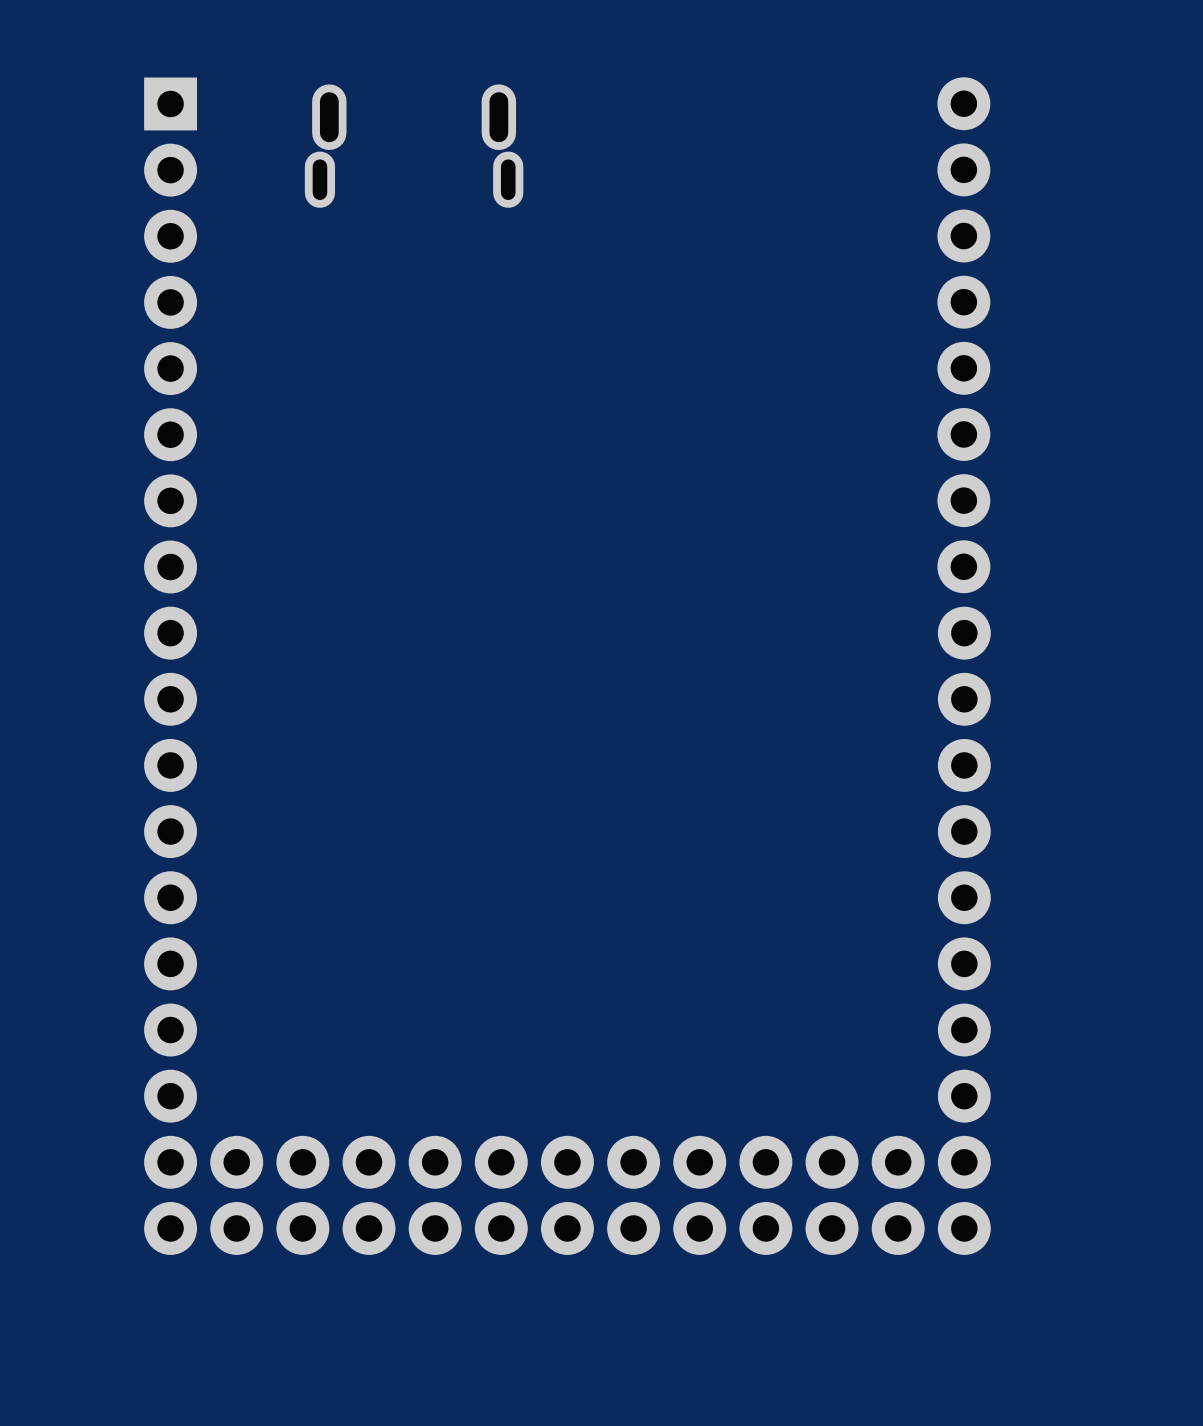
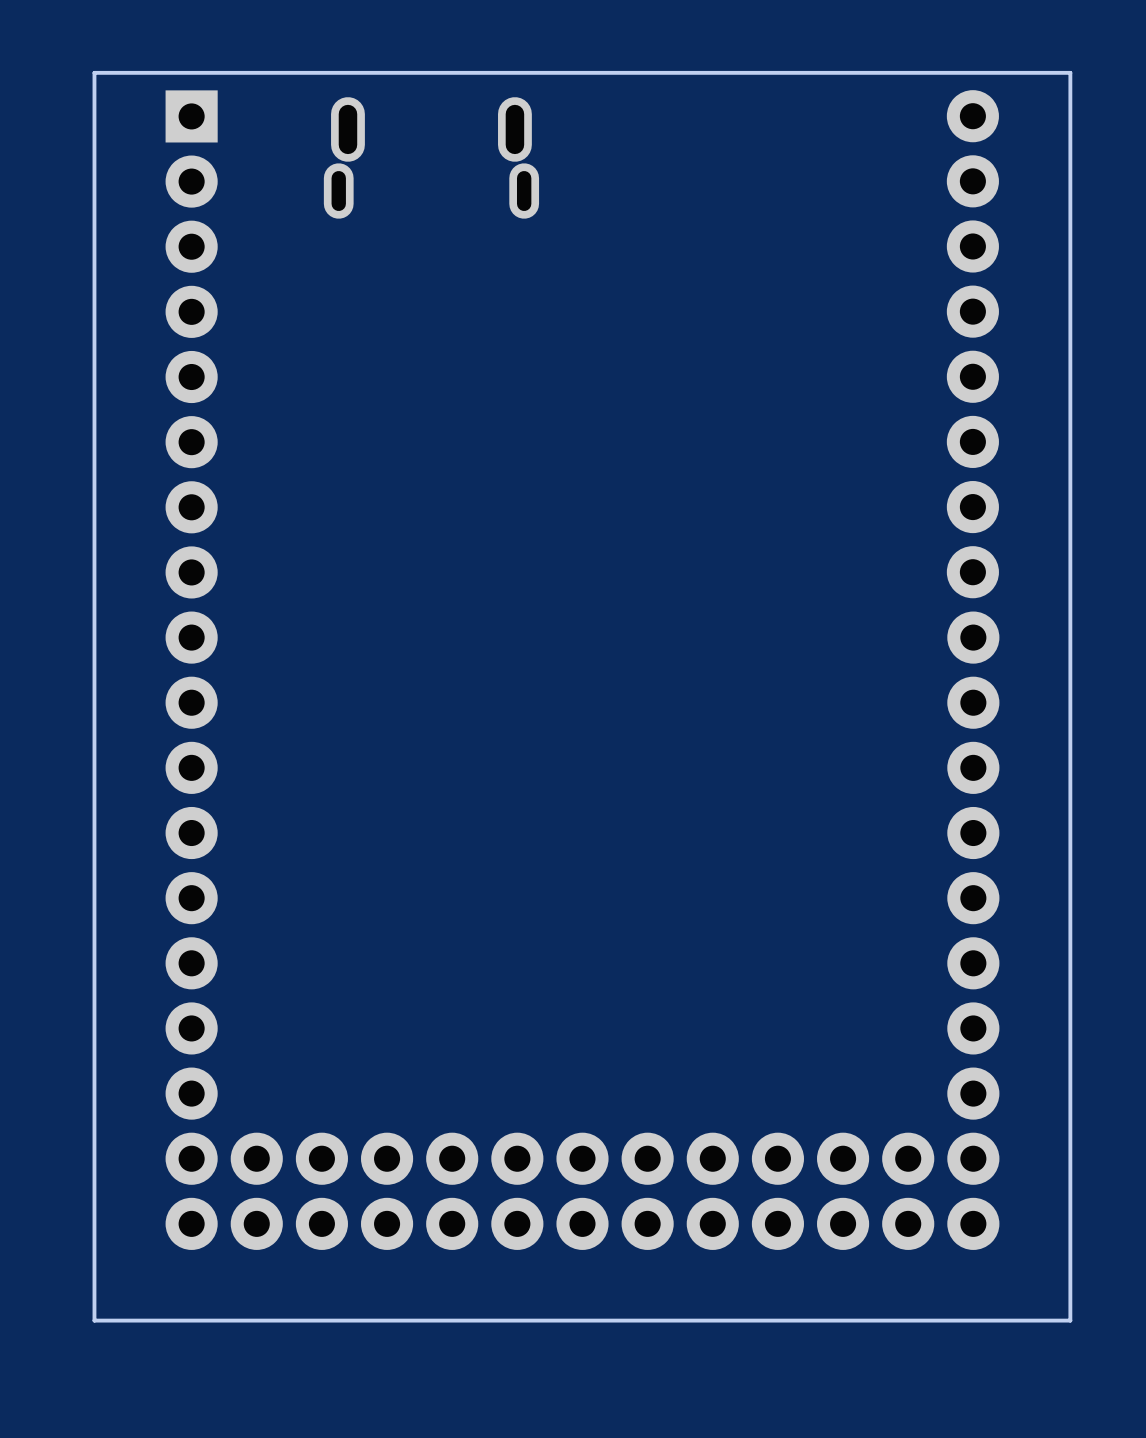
board edge: none -> (1070, 72) (94, 72) (94, 1320) (1070, 1320) (1070, 72)

